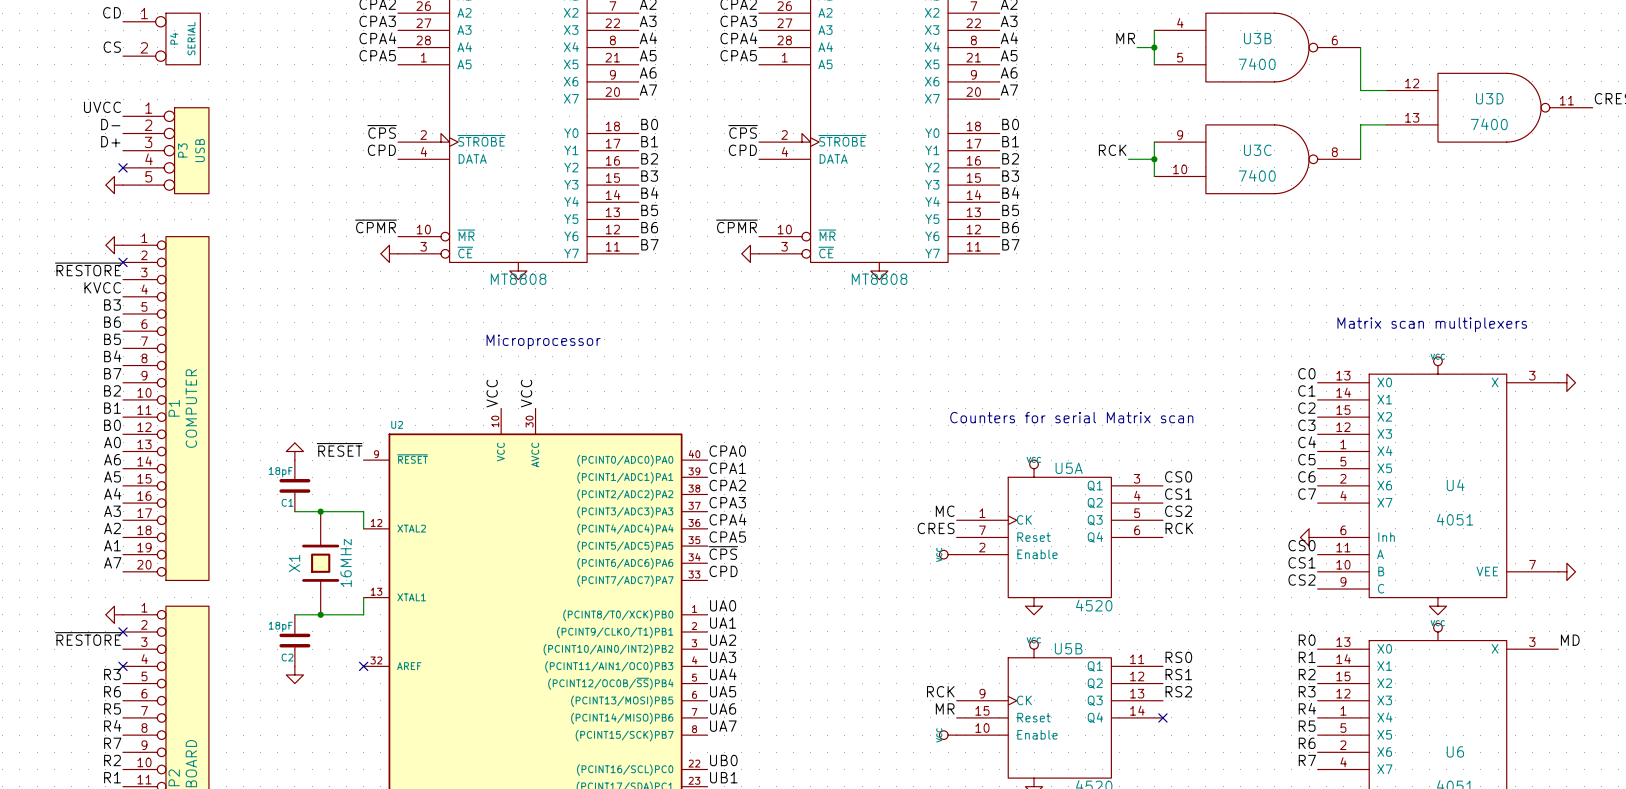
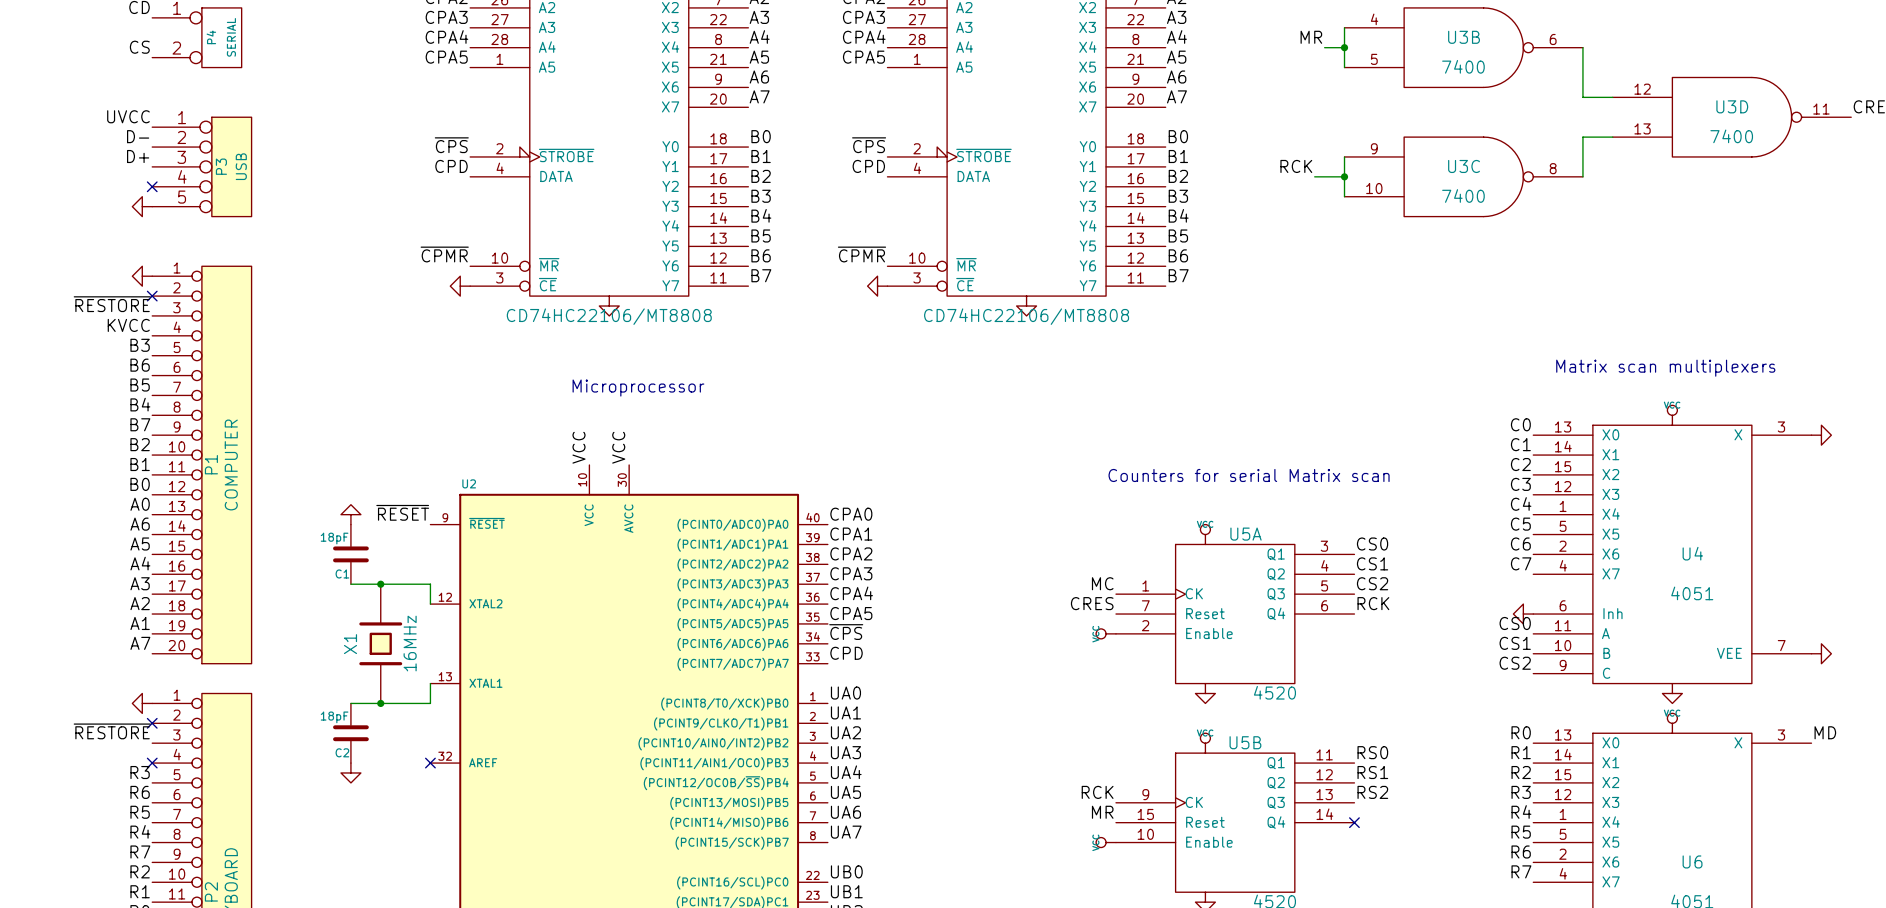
part value: MT8808 (518, 279) -> CD74HC22106/MT8808 (609, 316)
part value: MT8808 (879, 279) -> CD74HC22106/MT8808 (1026, 316)

